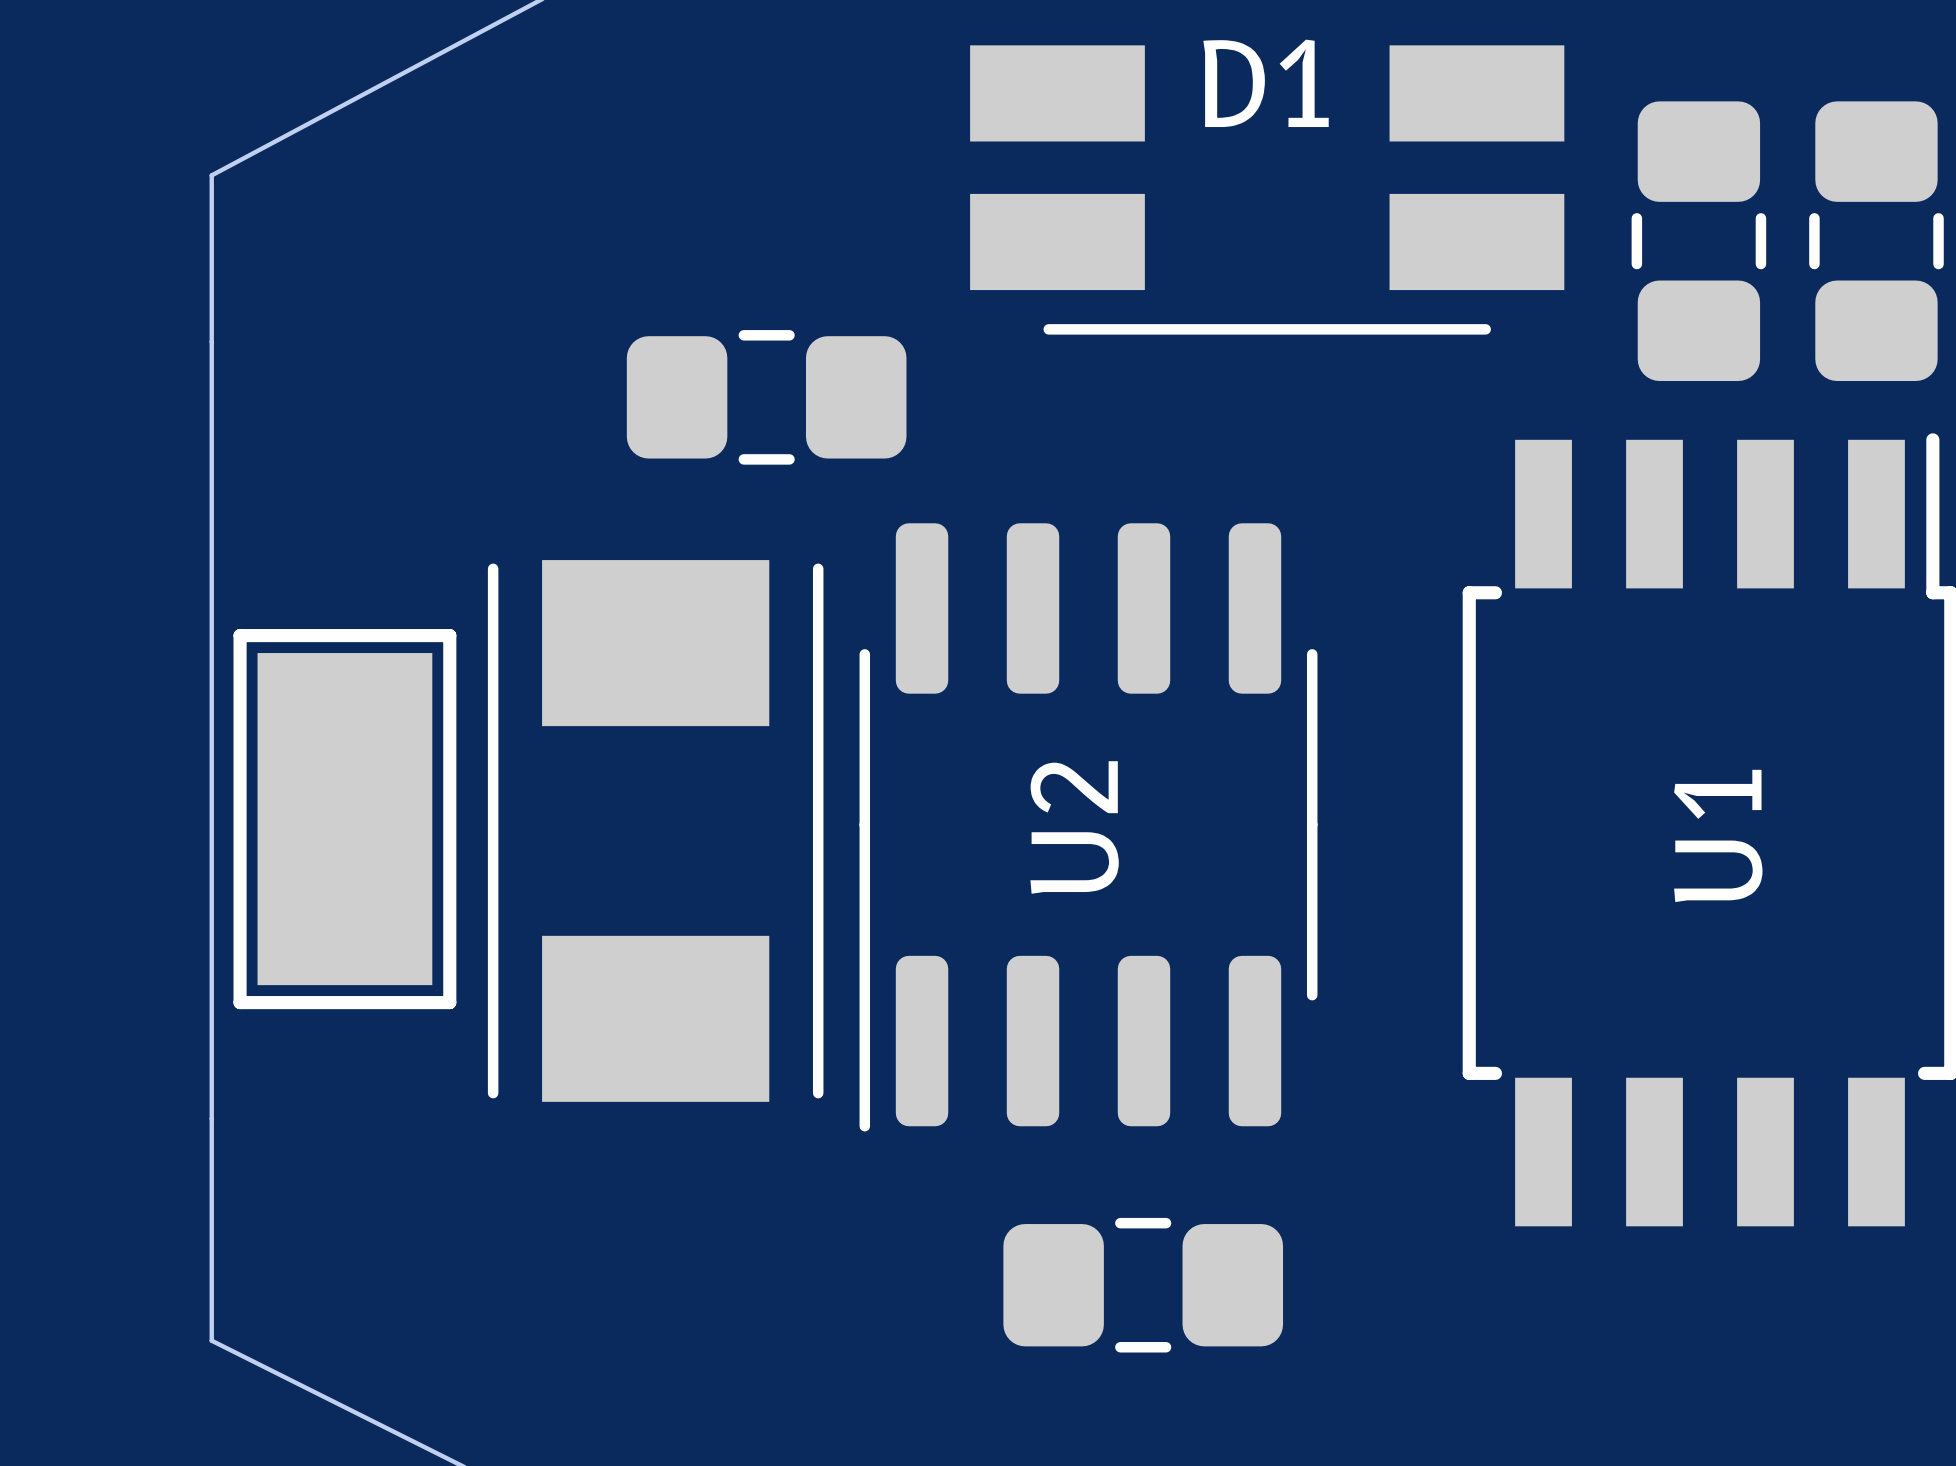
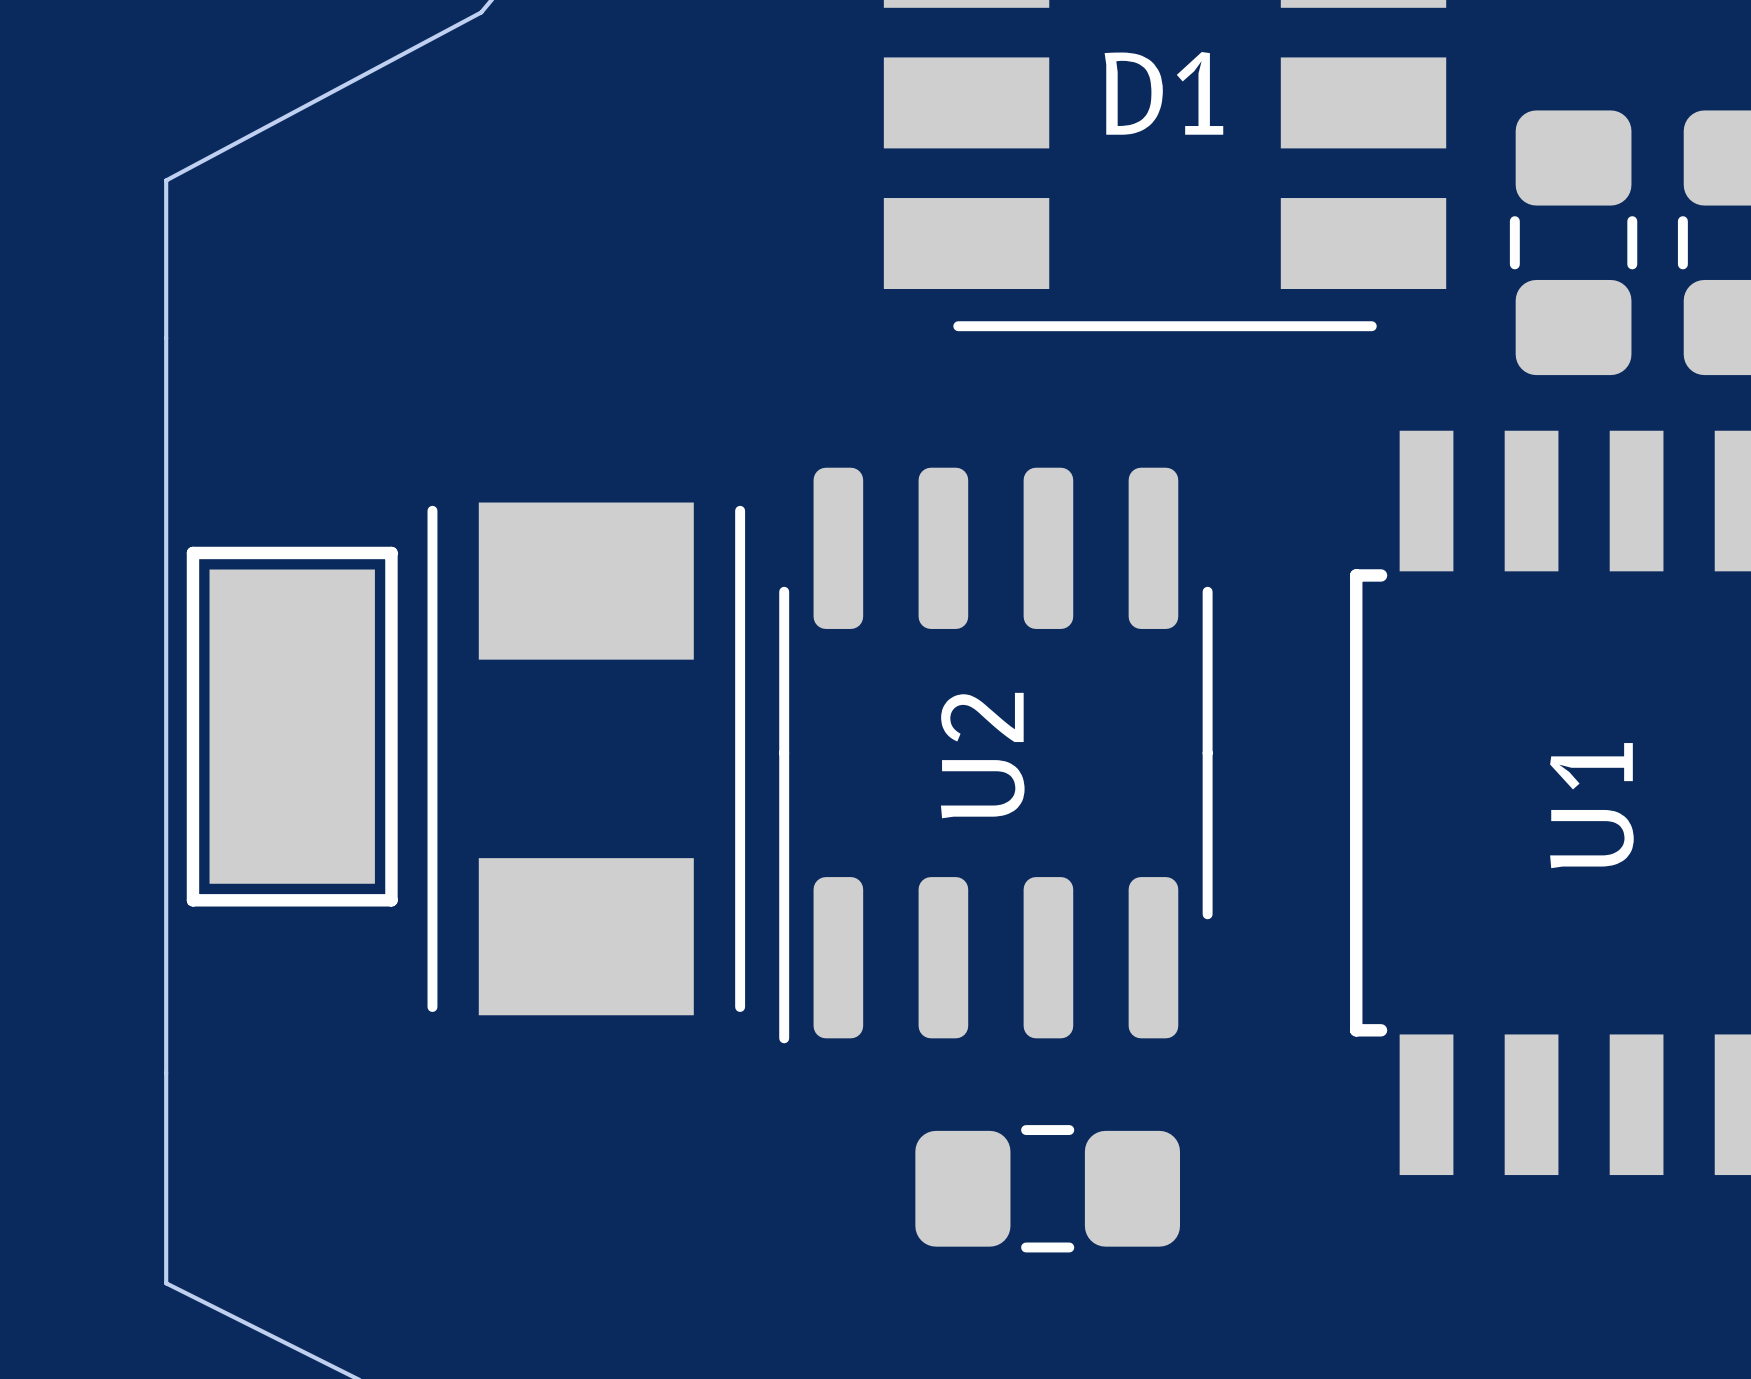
part: (766, 397) -> none
part position: (344, 819) -> (292, 726)
U2 position: (1088, 827) -> (995, 755)
part position: (655, 830) -> (586, 758)
part position: (1143, 1285) -> (1047, 1188)

